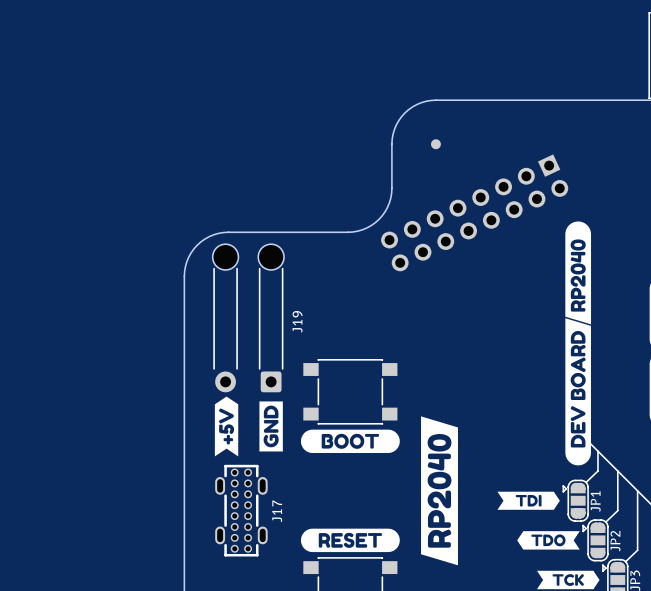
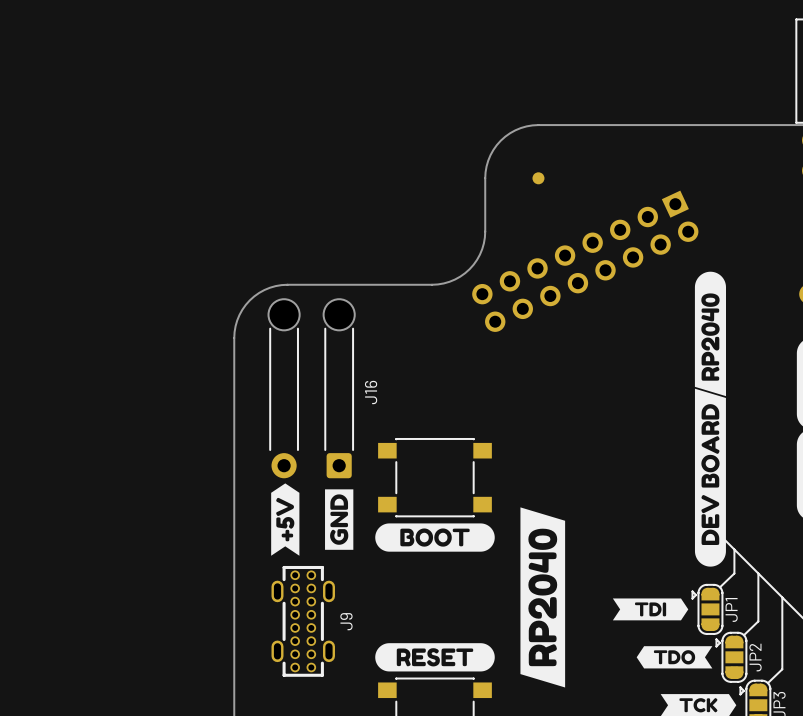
J19 name: J19 (297, 321) -> J16 (371, 392)
J17 name: J17 (277, 511) -> J9 (346, 621)

